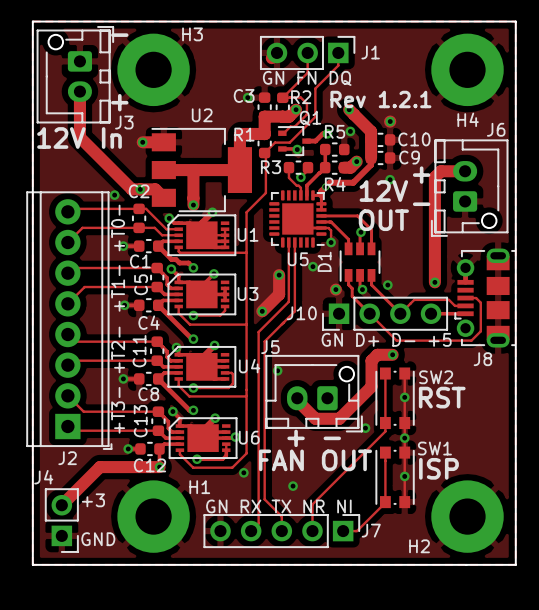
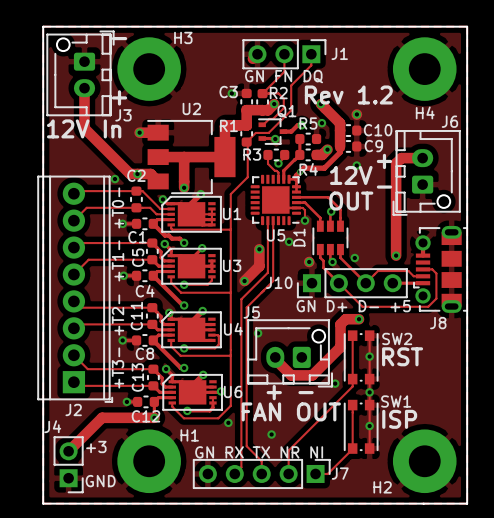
text: Rev 1.2.1 (380, 99) -> Rev 1.2 (348, 94)

